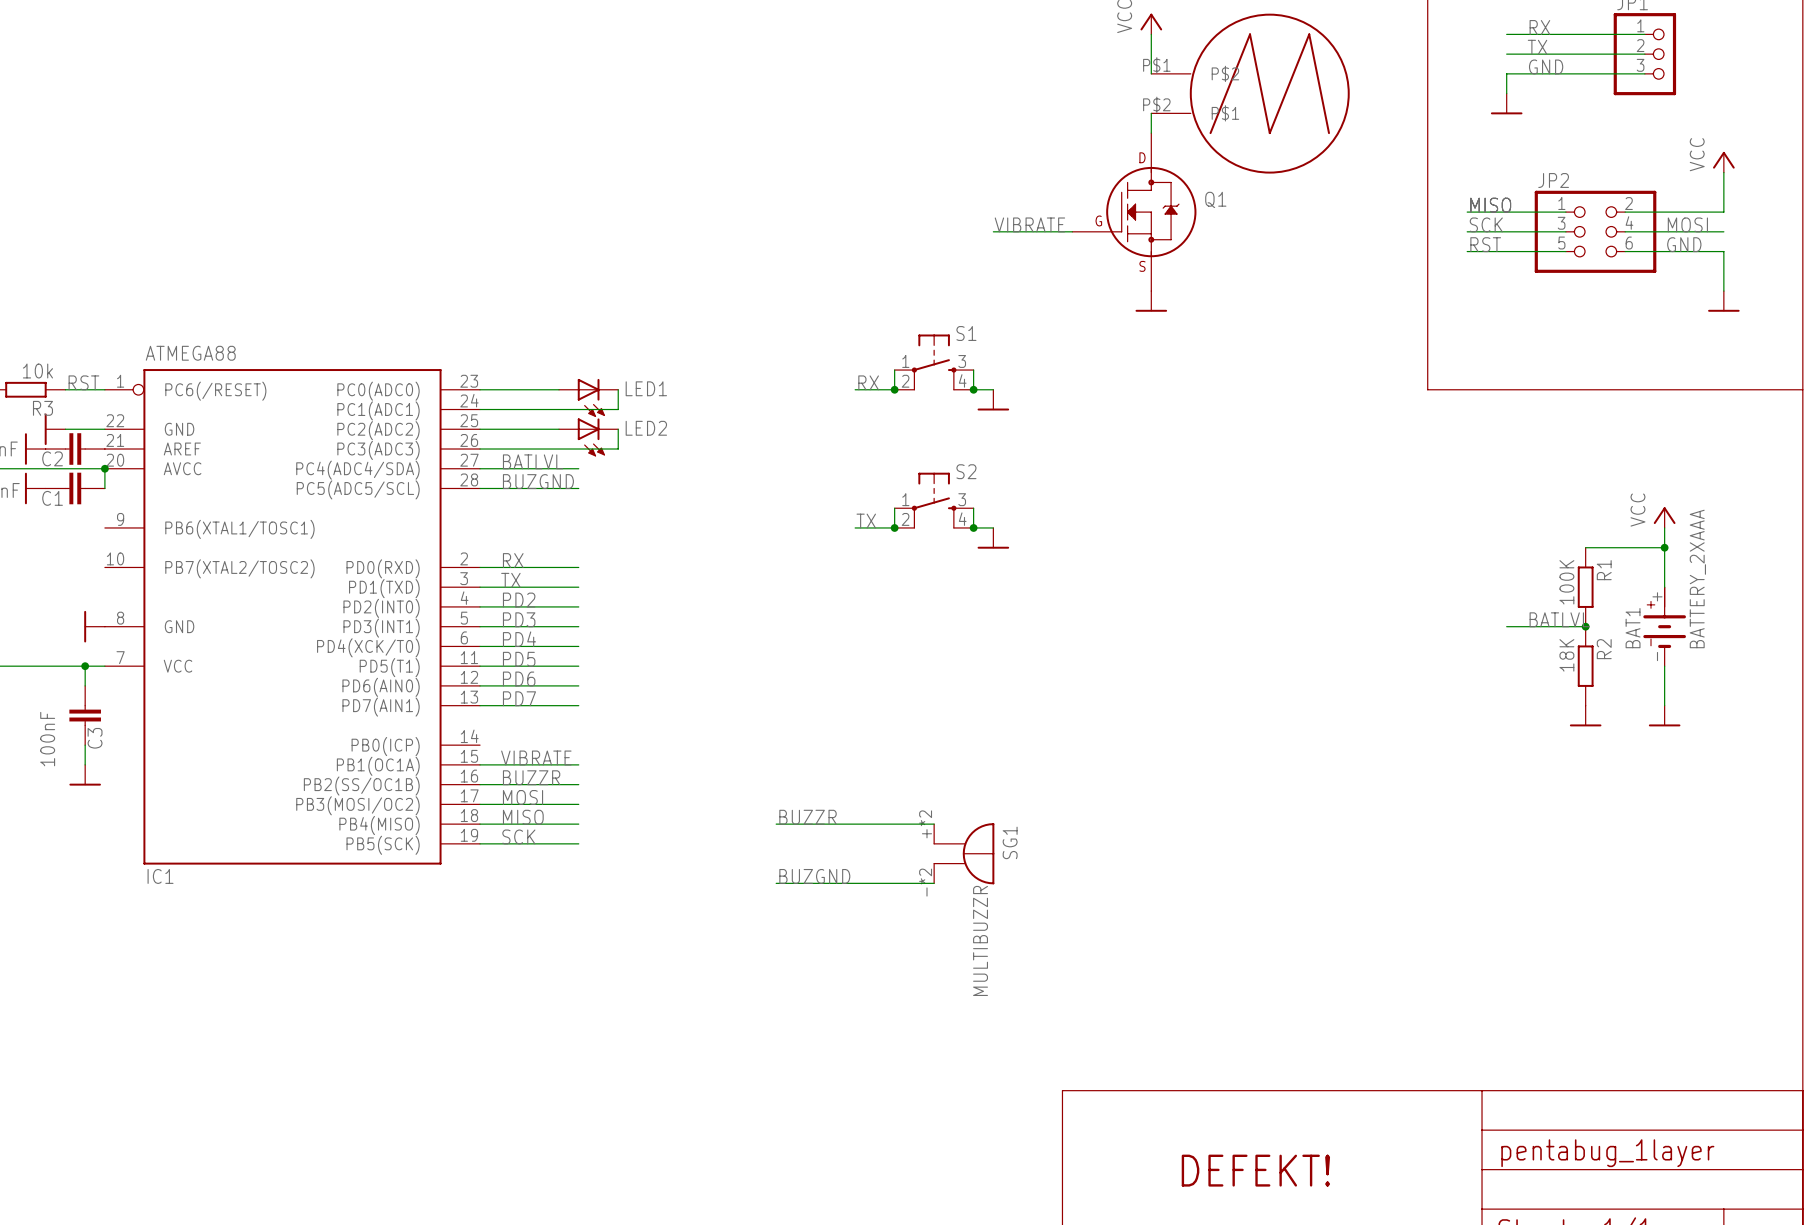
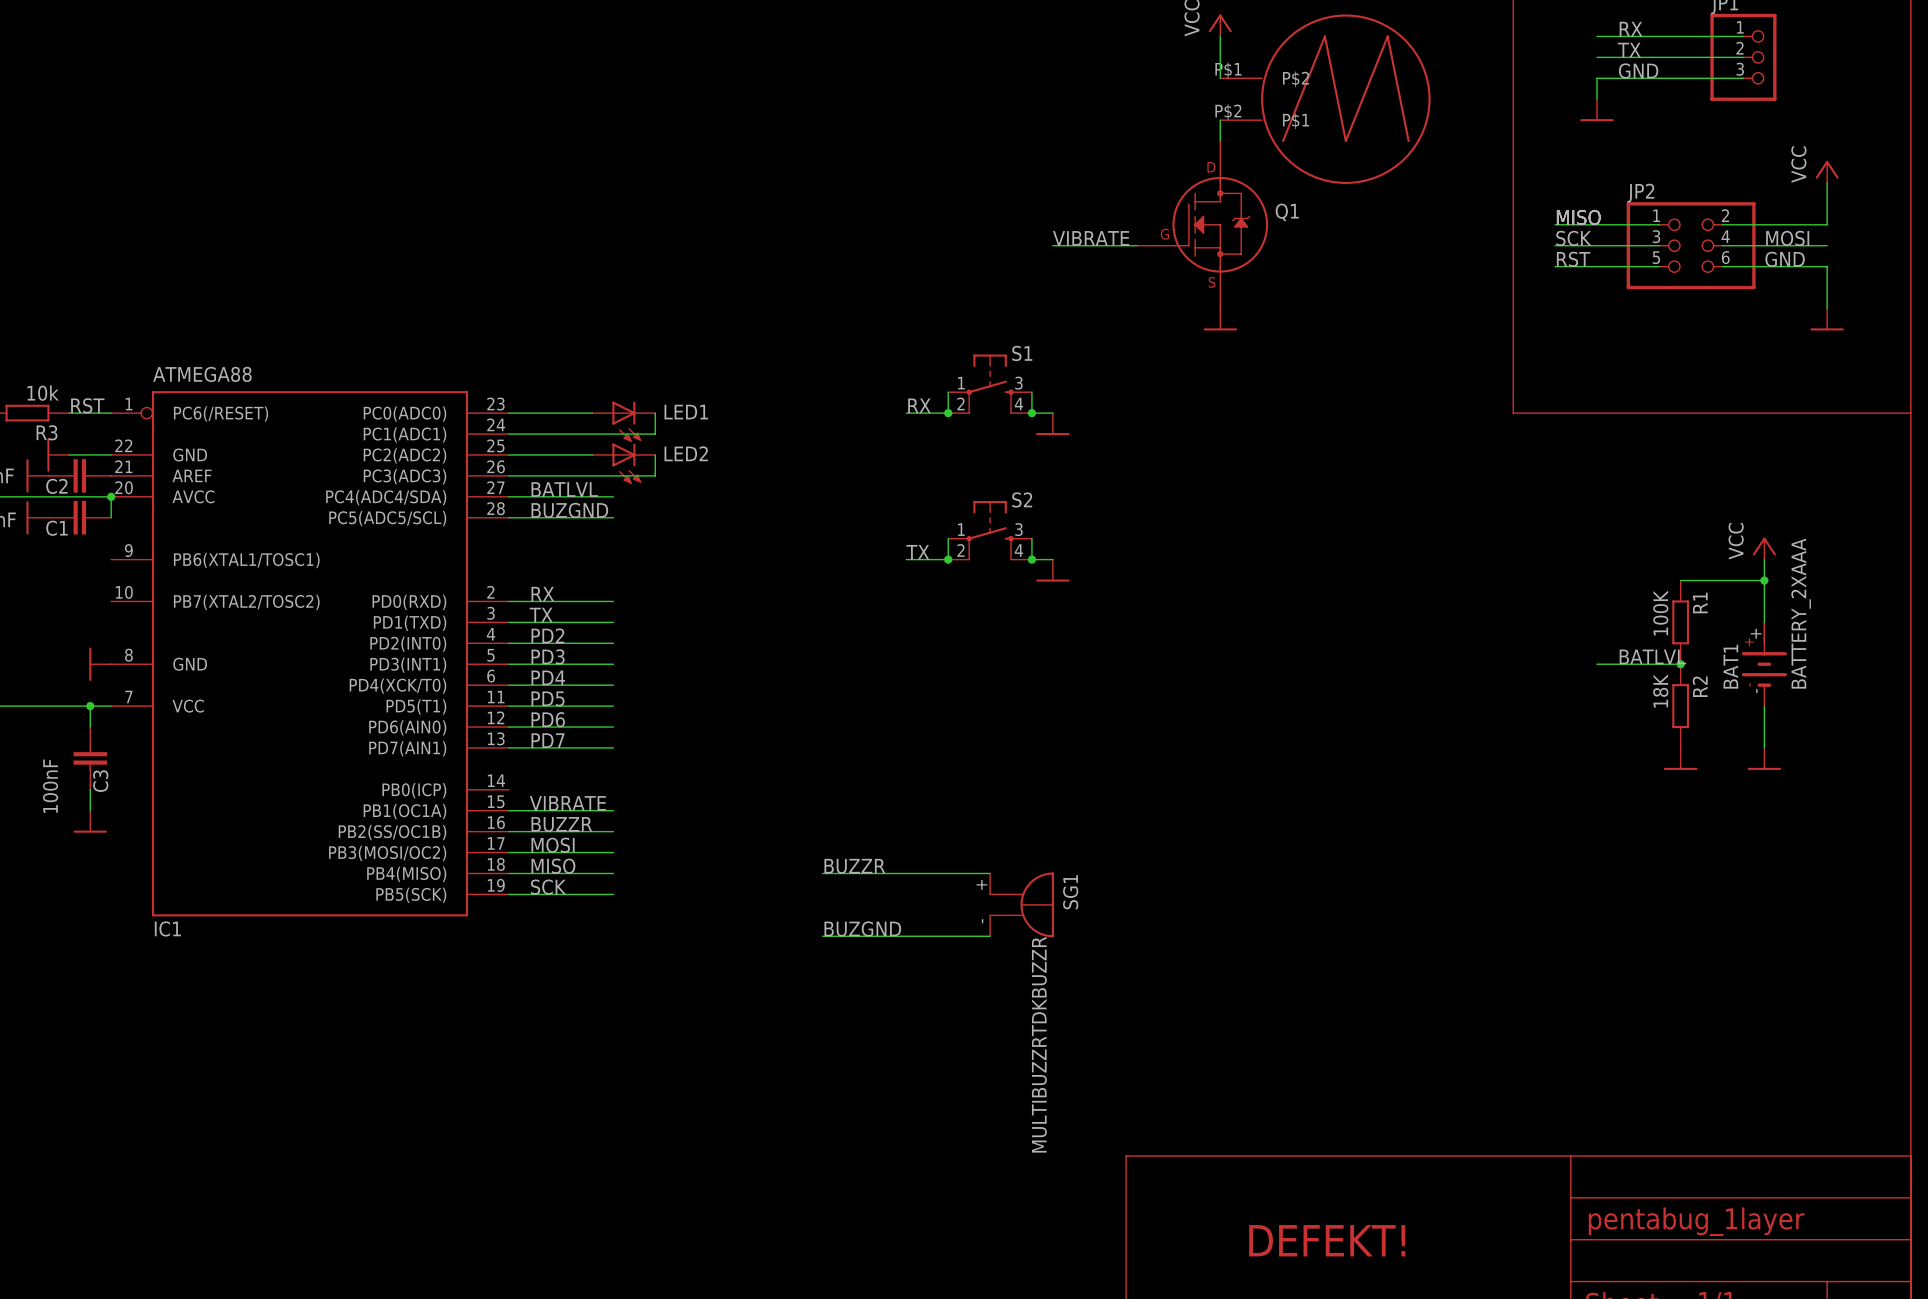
SG1 pin number: +*2 (925, 824) -> + (981, 884)
SG1 pin number: -*2 (925, 882) -> - (982, 921)
SG1 value: MULTIBUZZR (980, 940) -> MULTIBUZZRTDKBUZZR (1039, 1044)

